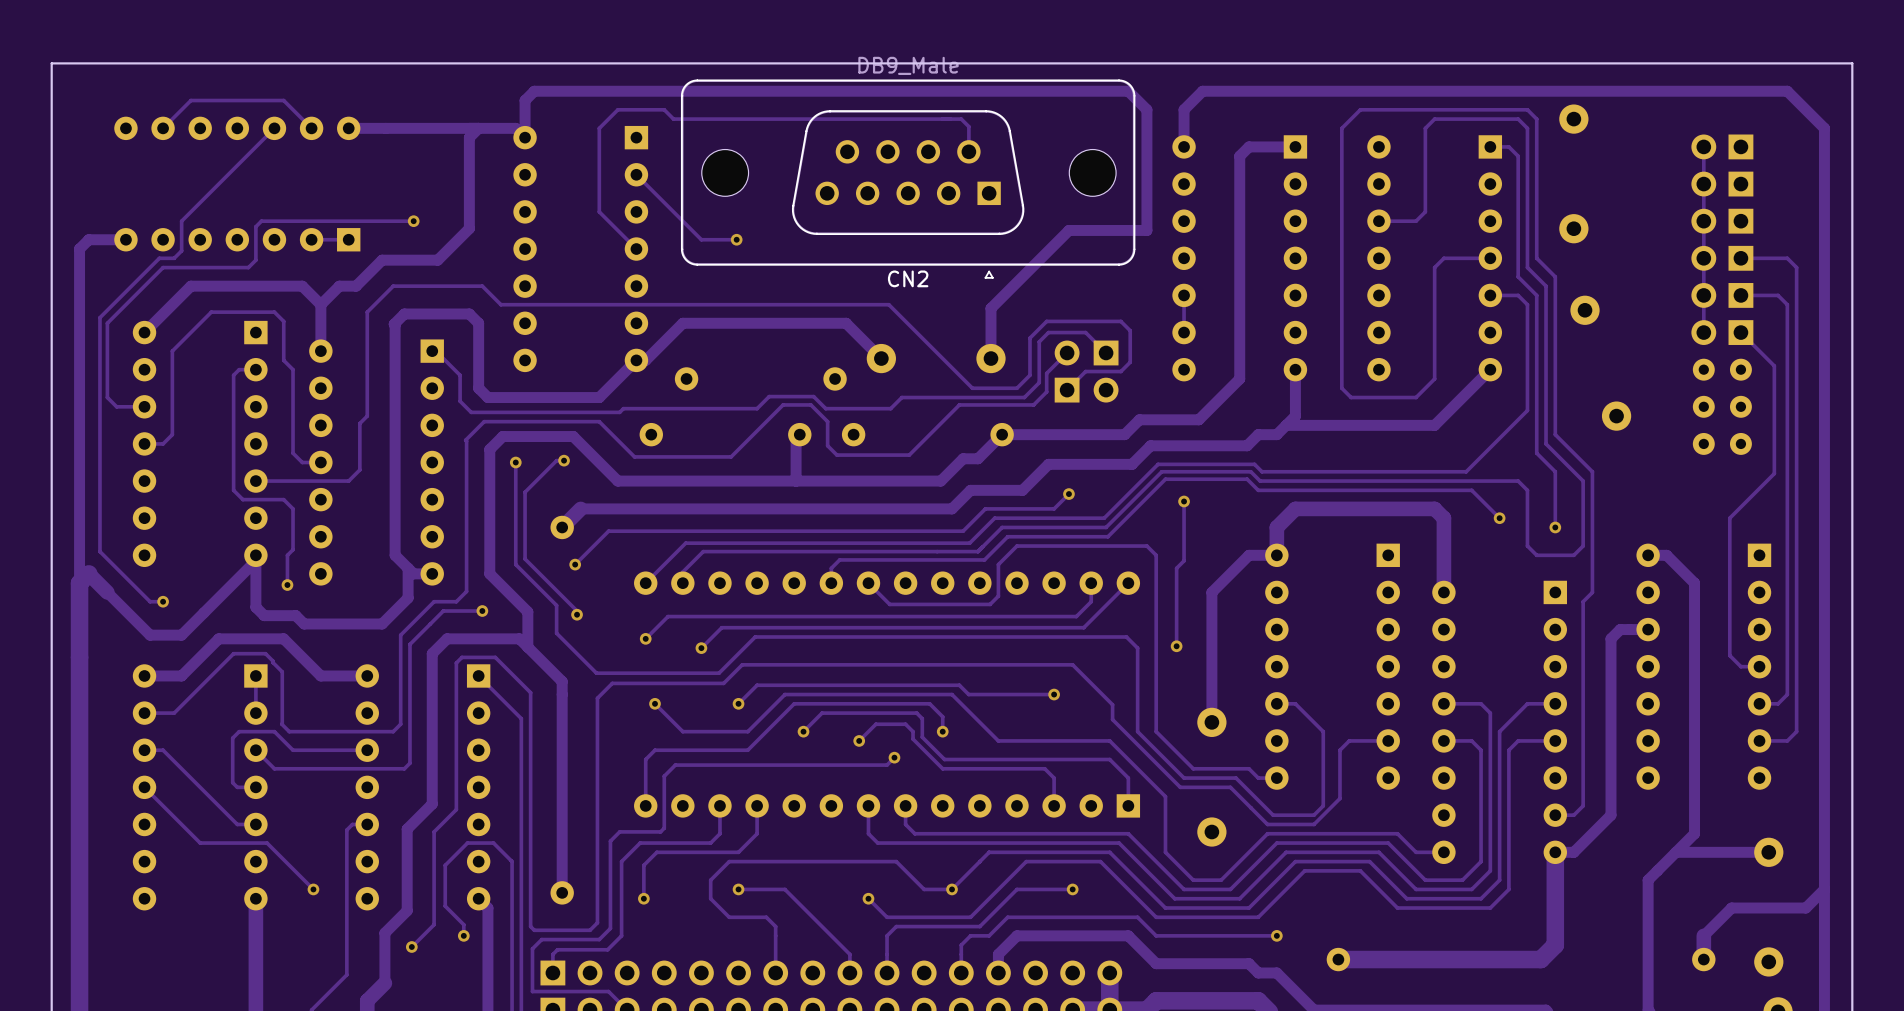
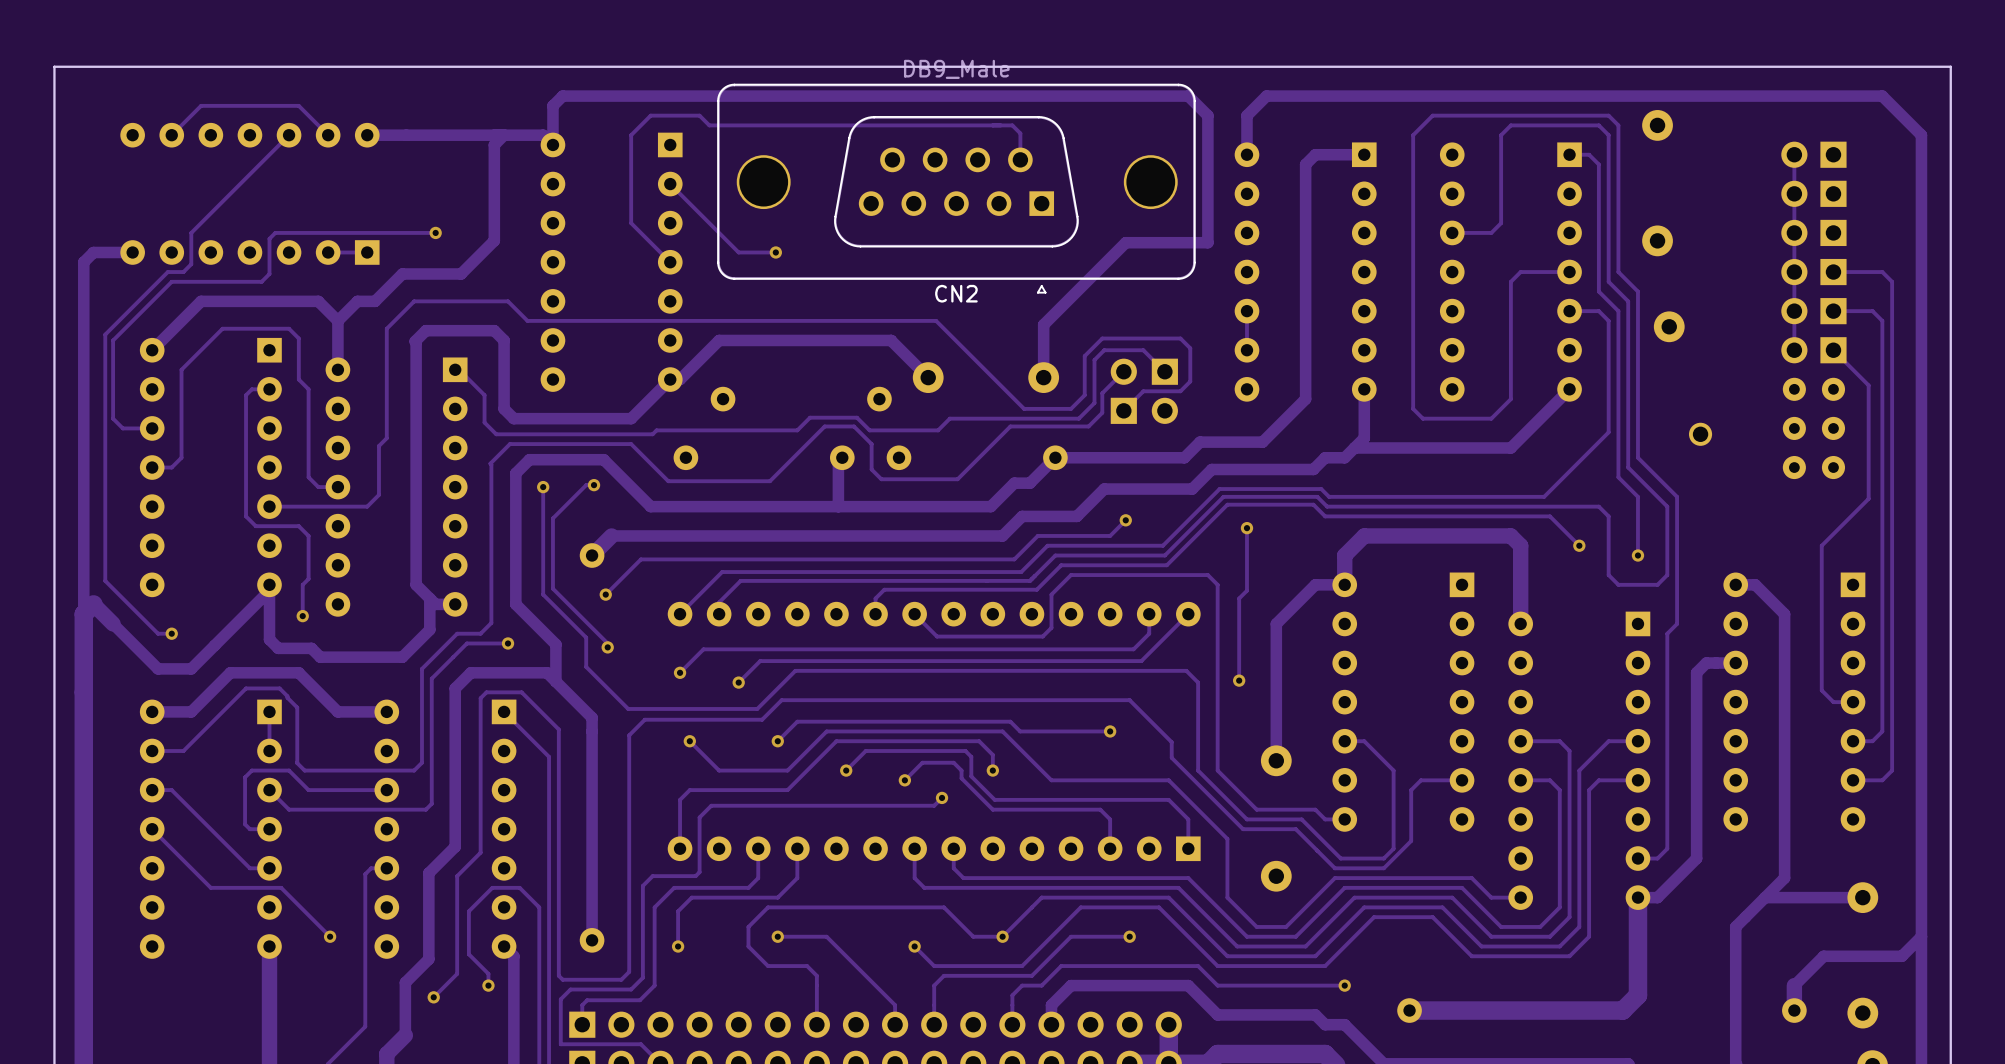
part footprint: [701, 149, 749, 197] -> [736, 155, 791, 210]
part footprint: [1069, 149, 1117, 197] -> [1123, 155, 1178, 210]
part footprint: [1601, 401, 1632, 431] -> [1688, 422, 1713, 446]

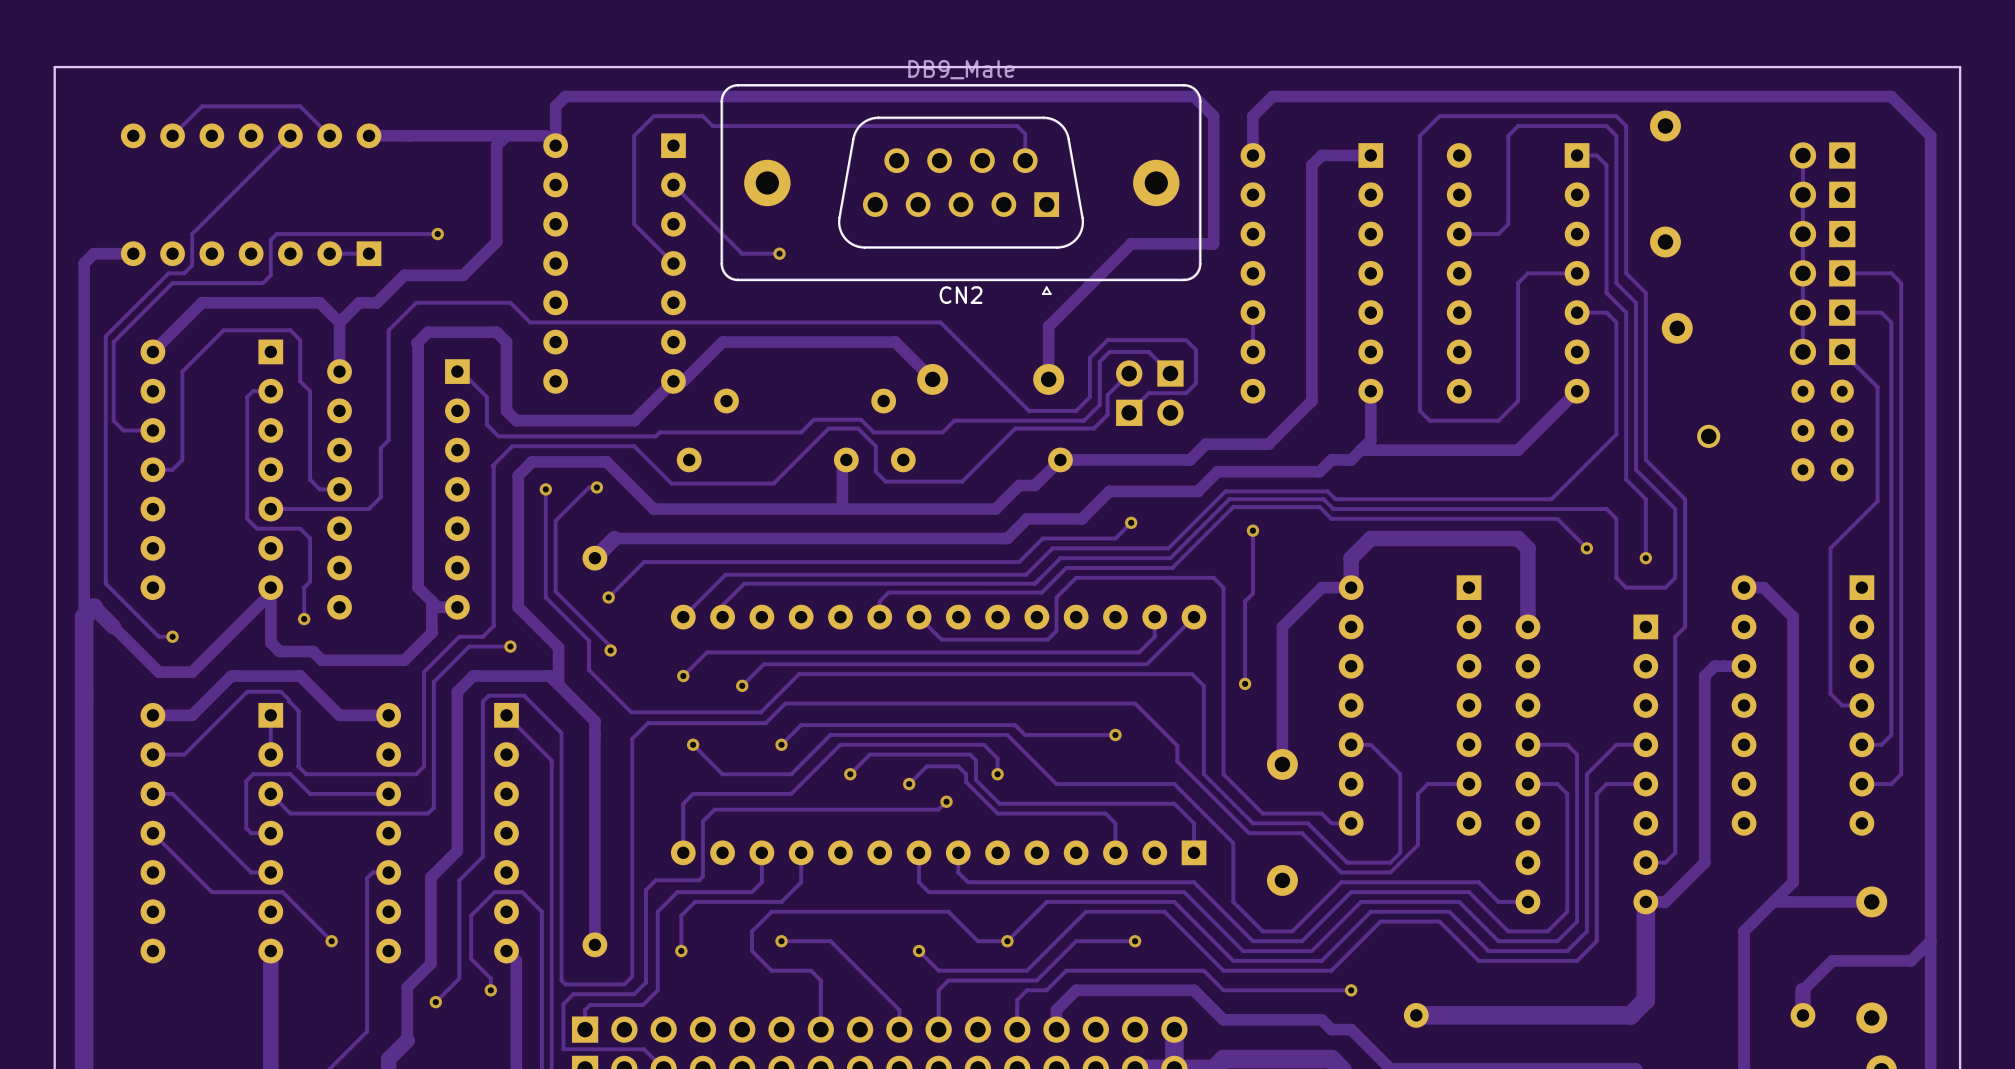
part footprint: [736, 155, 791, 210] -> [744, 159, 791, 207]
part footprint: [1123, 155, 1178, 210] -> [1133, 159, 1180, 207]

